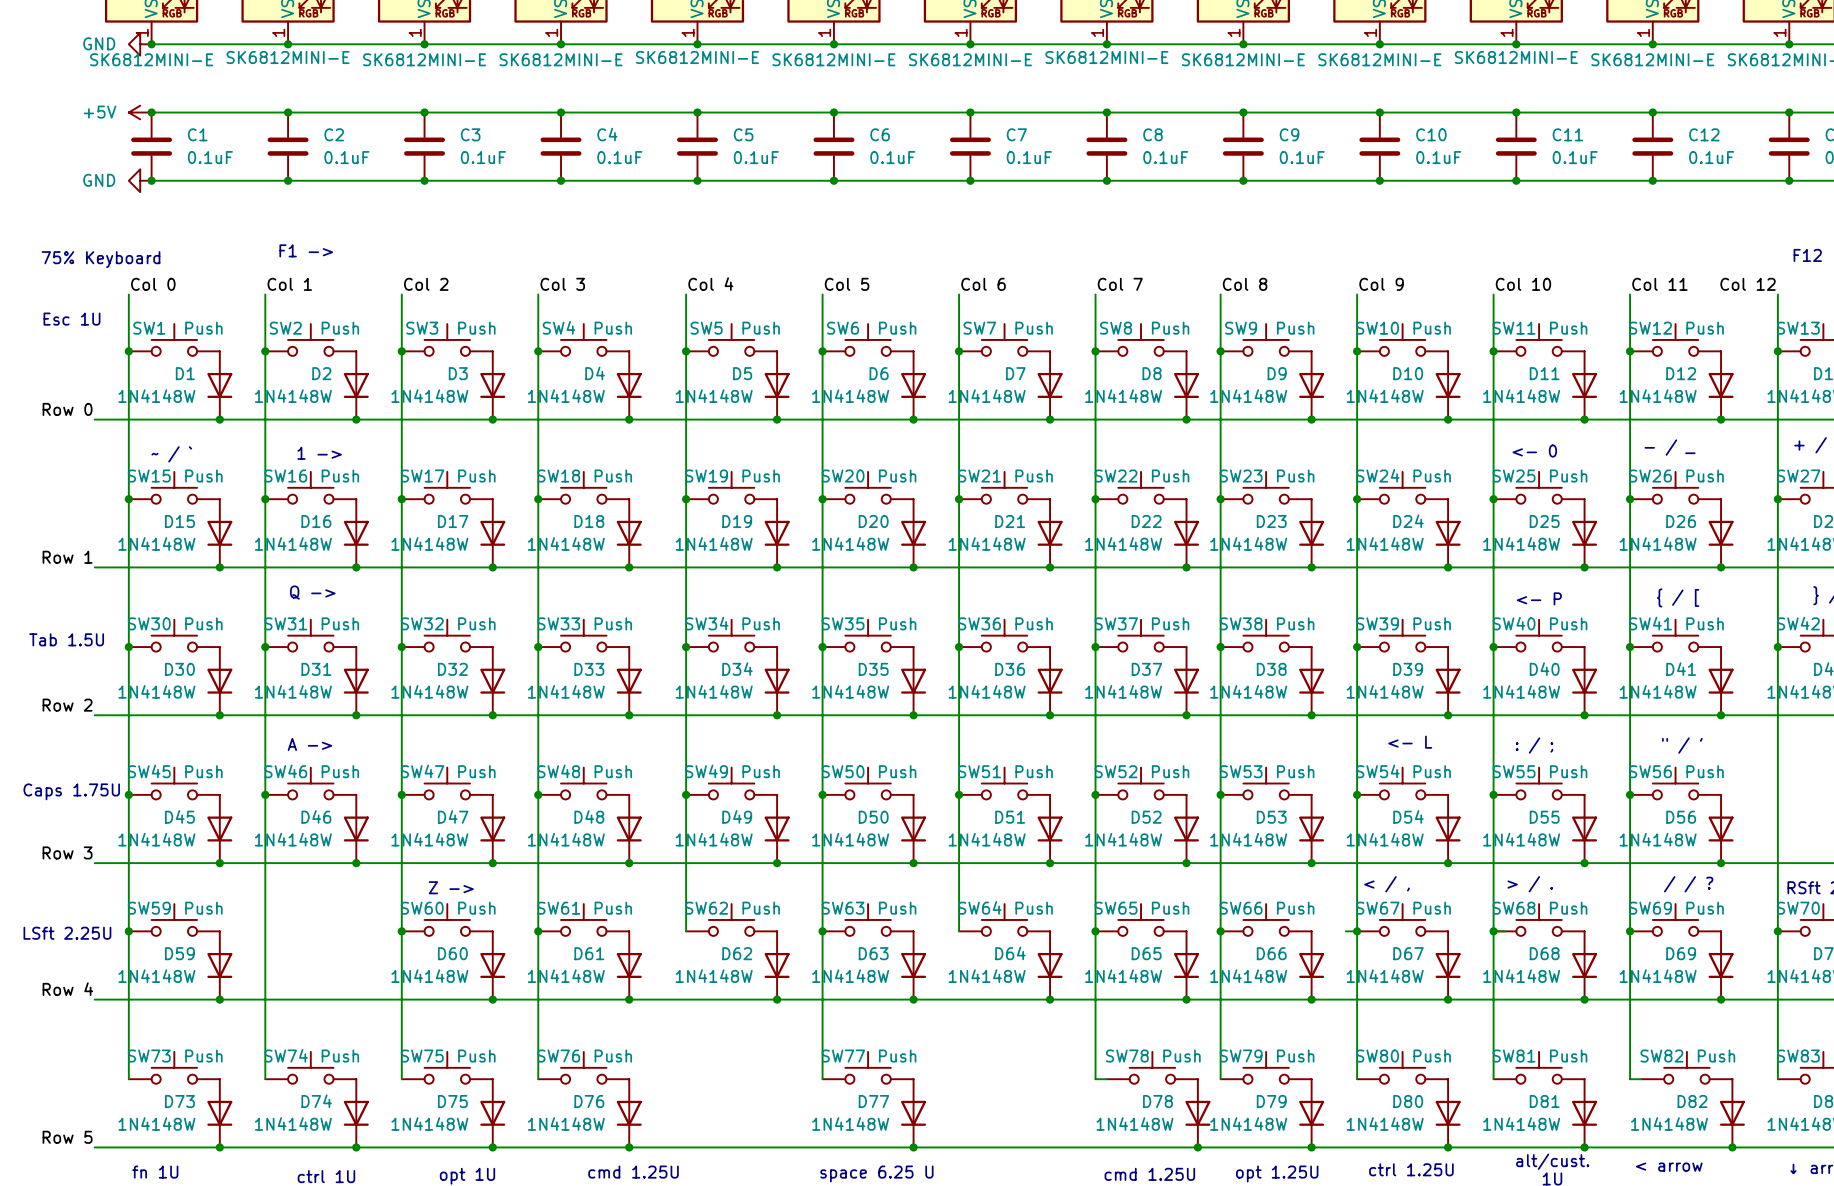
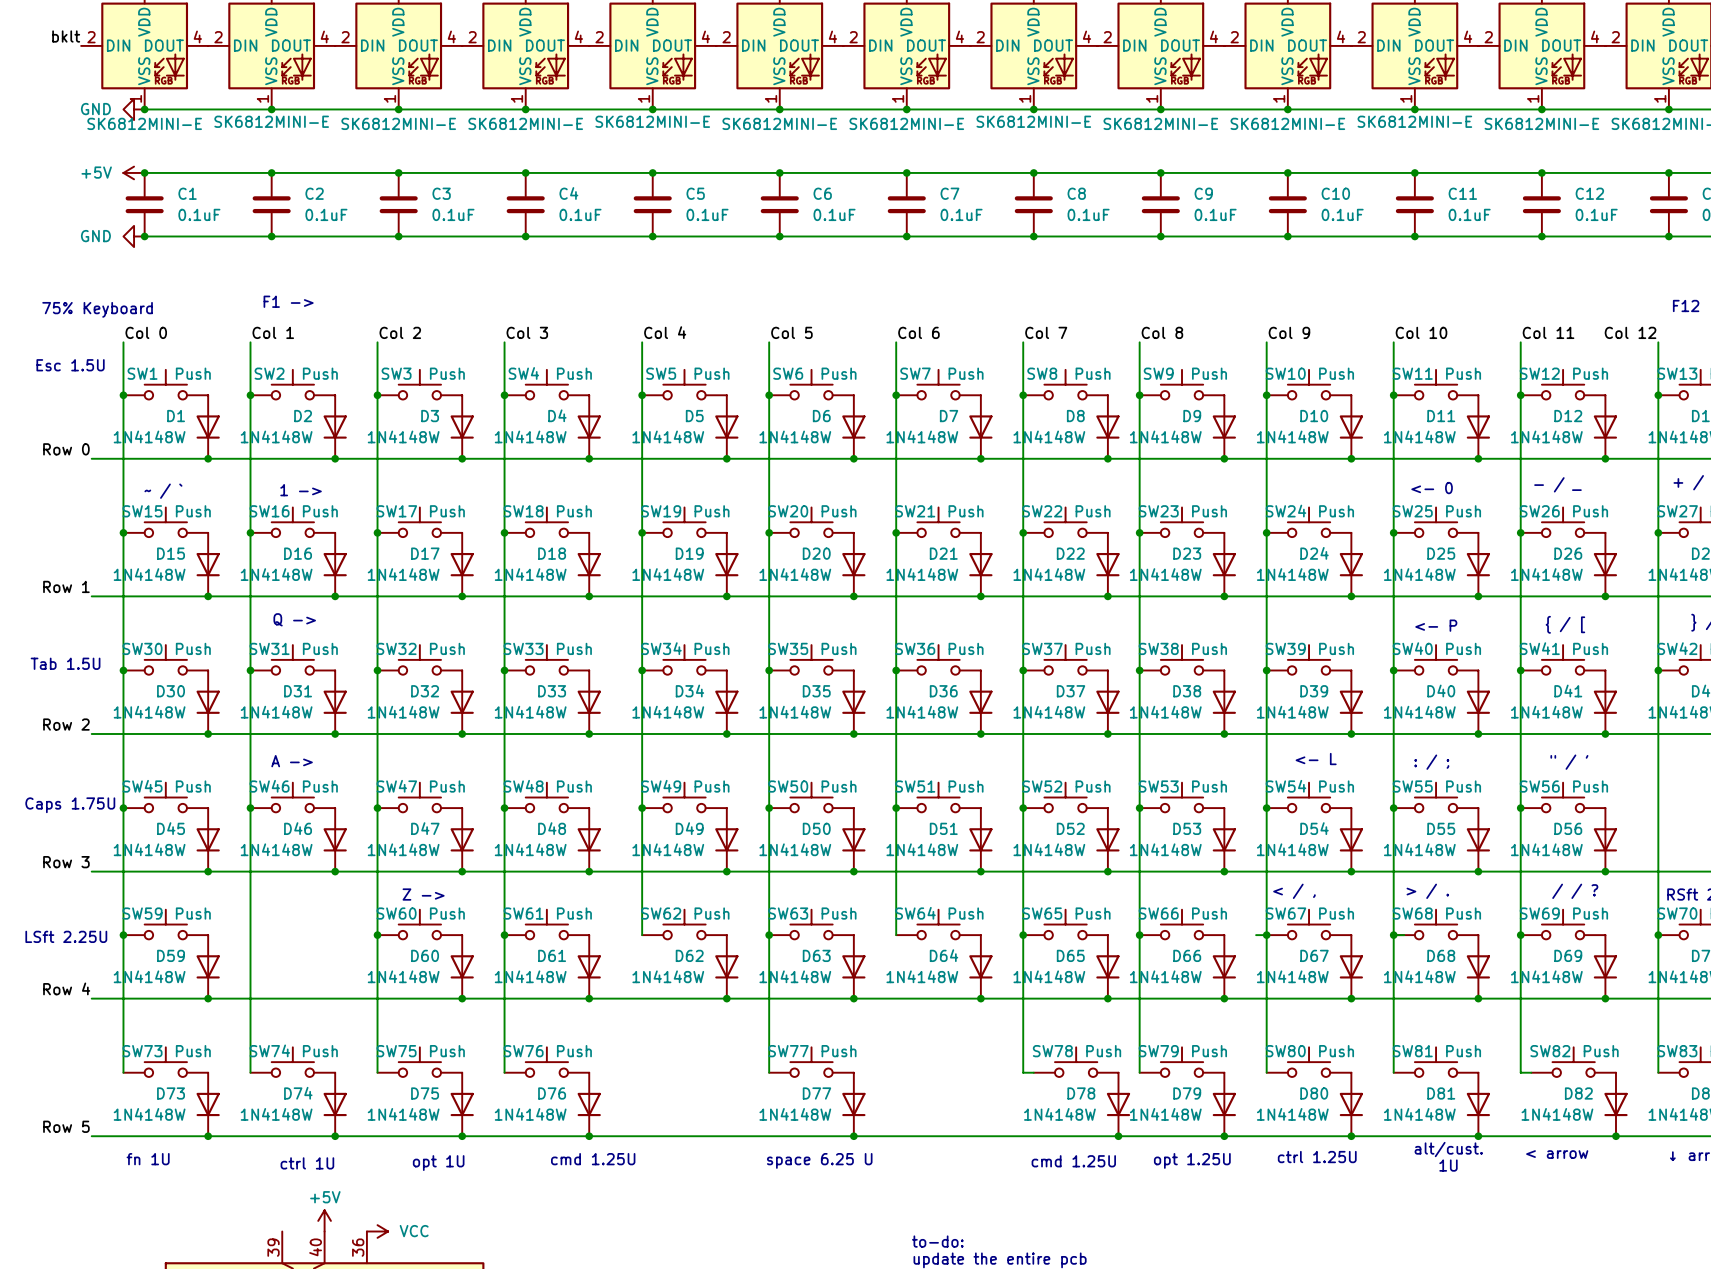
text: Esc 1U (71, 319) -> Esc 1.5U (70, 365)

